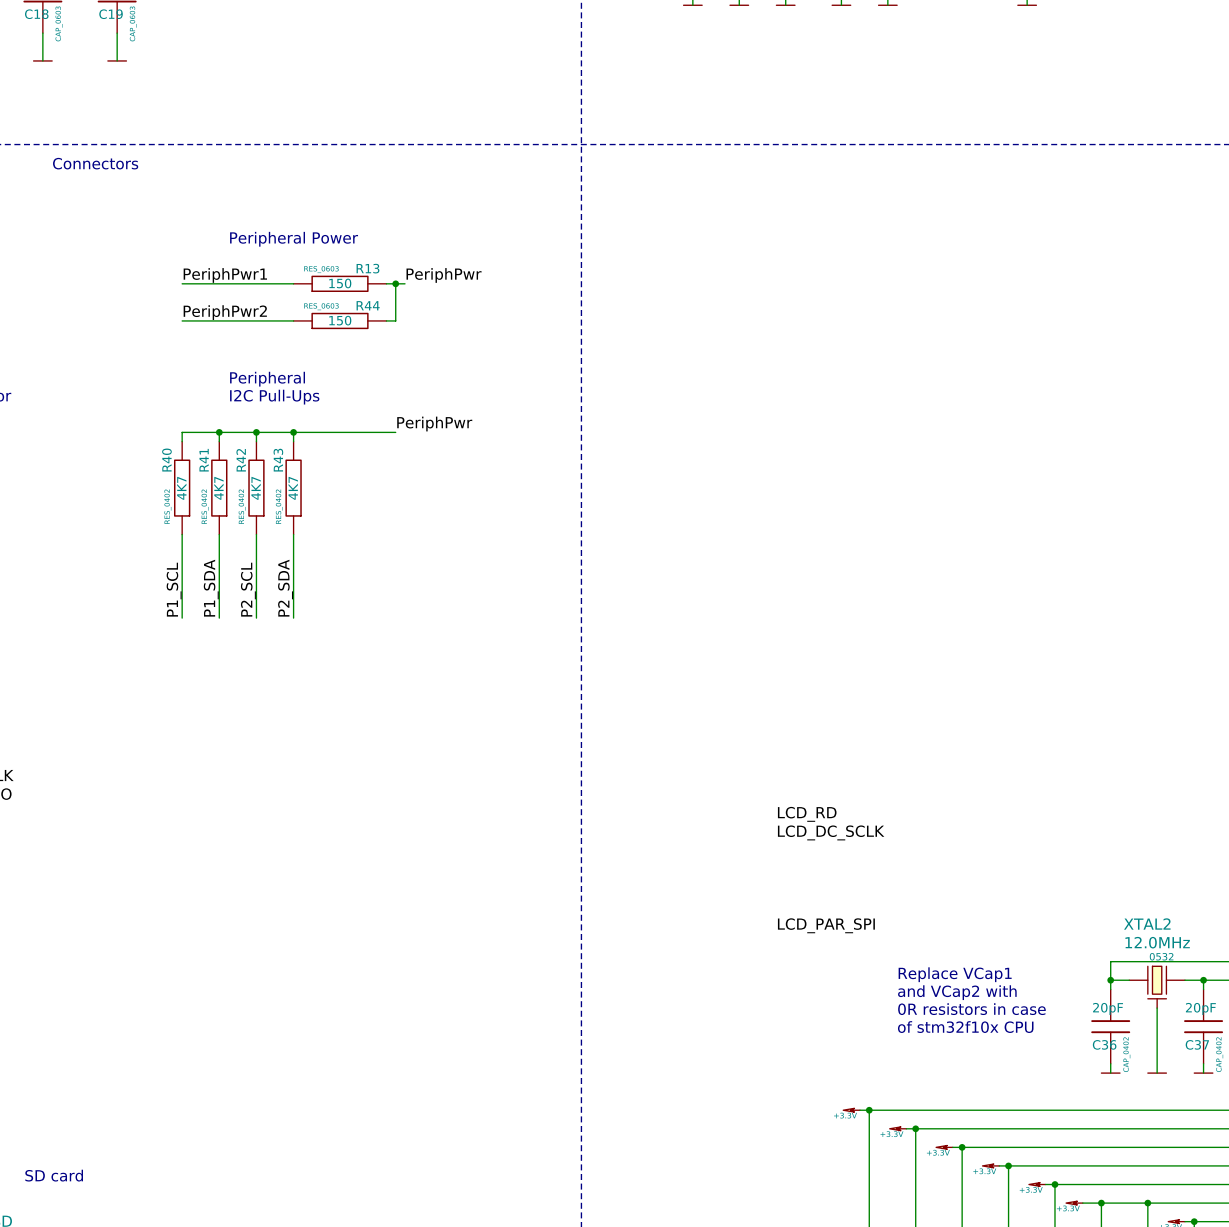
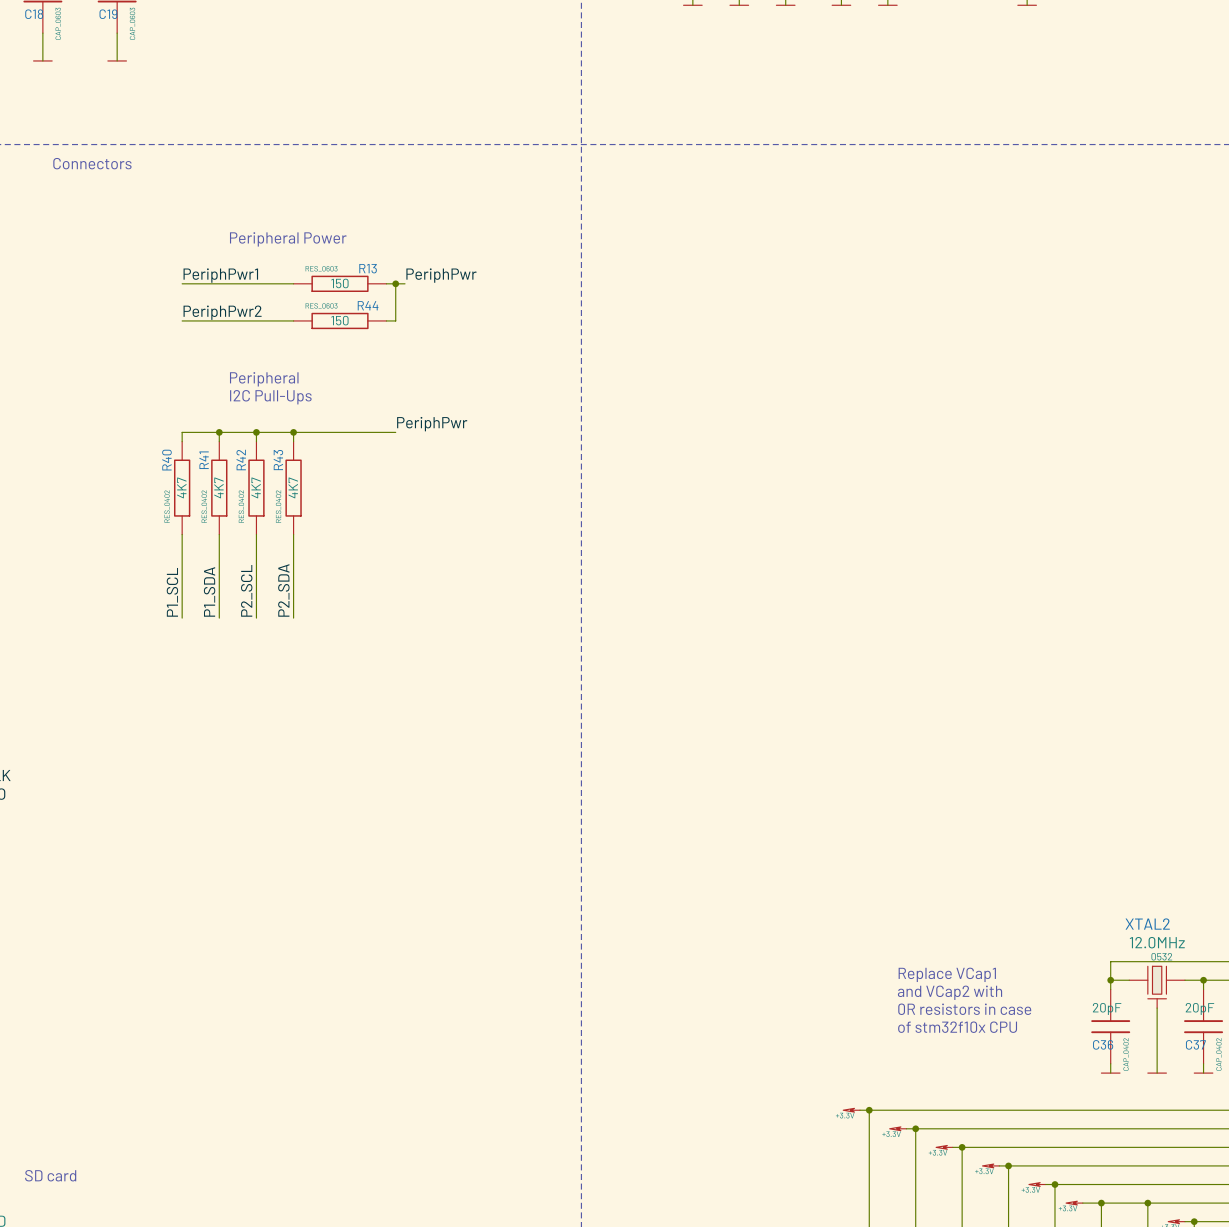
label: LCD_RD (807, 814) -> none
label: LCD_DC_SCLK (831, 832) -> none
label: LCD_PAR_SPI (826, 925) -> none

